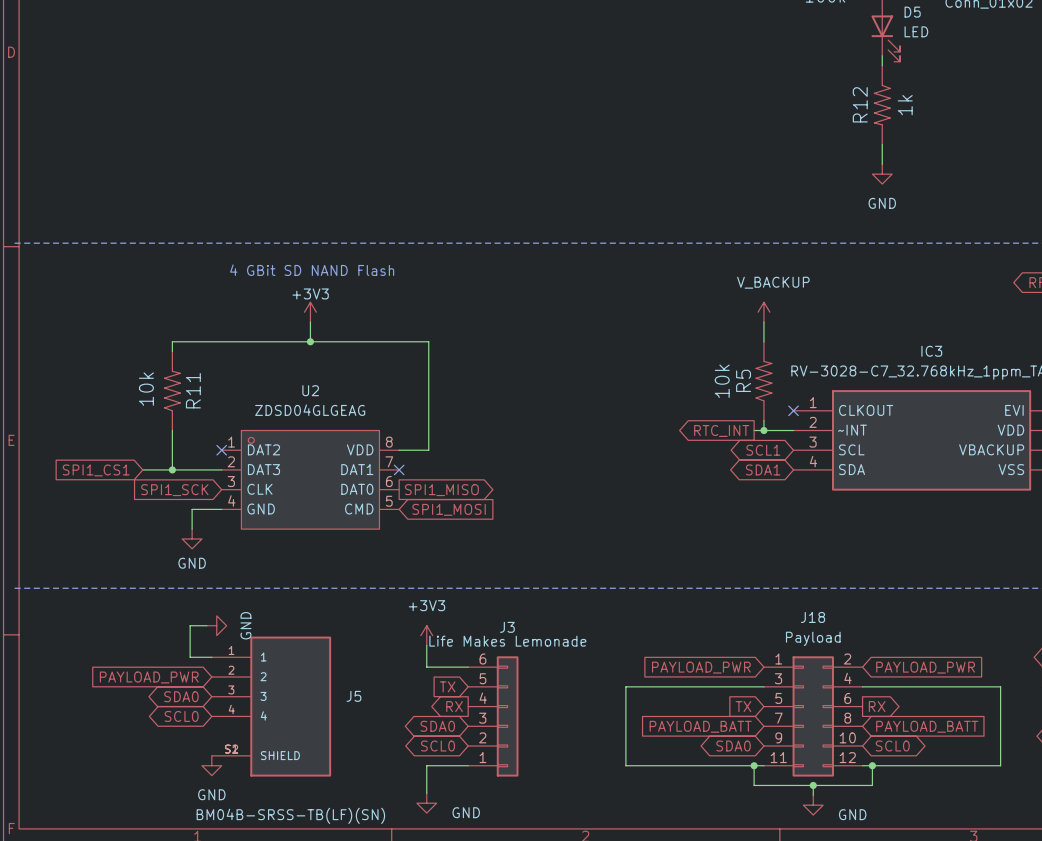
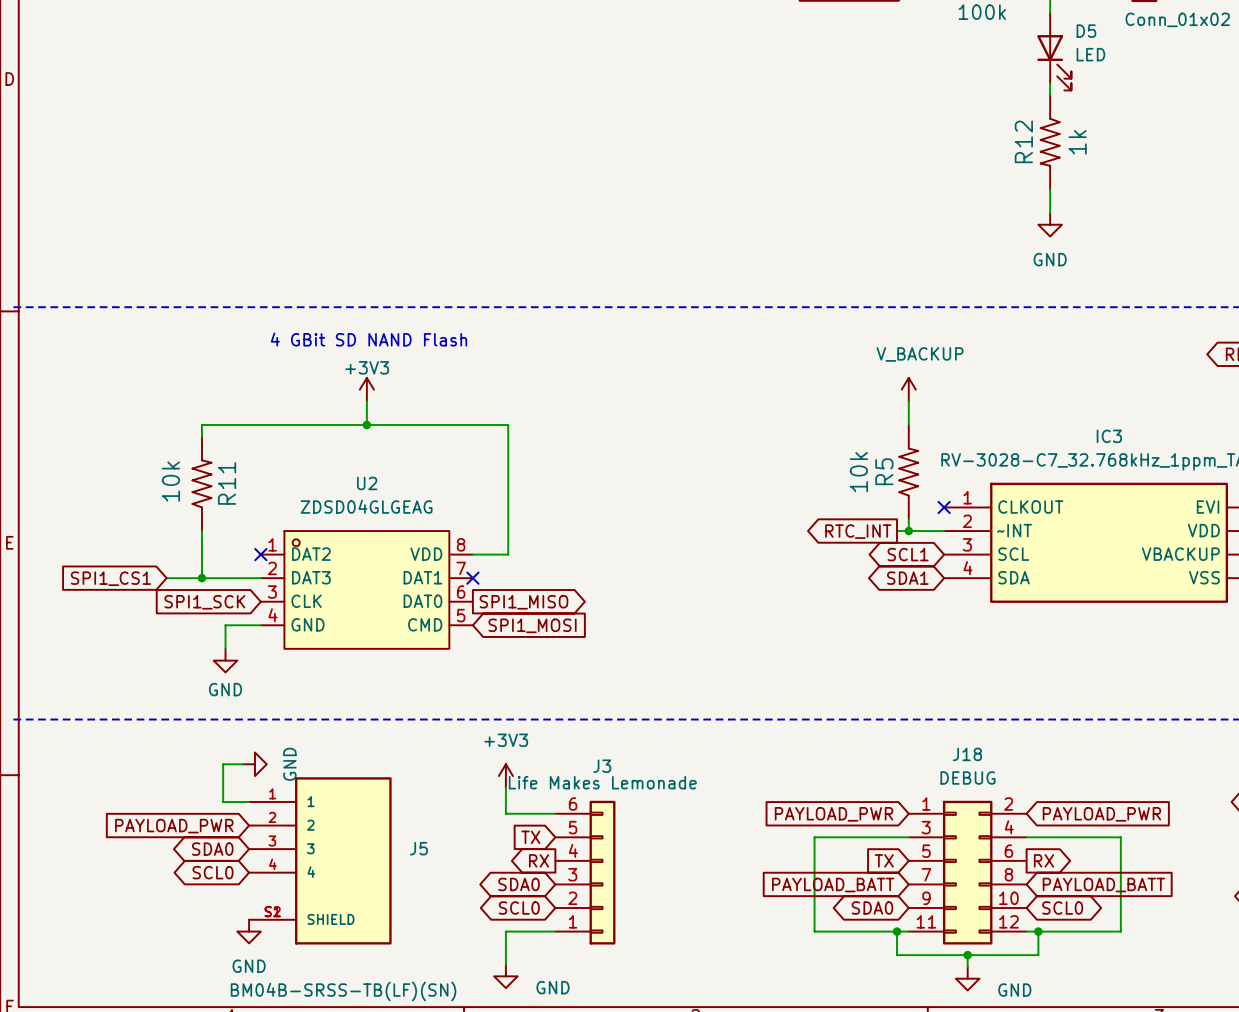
J18 value: Payload (813, 638) -> DEBUG (967, 777)
wire: (685, 686) (625, 686) (625, 765) (685, 765) -> (814, 837) (814, 931)
wire: (941, 686) (1000, 686) (1000, 765) (941, 765) -> (1120, 837) (1120, 931)

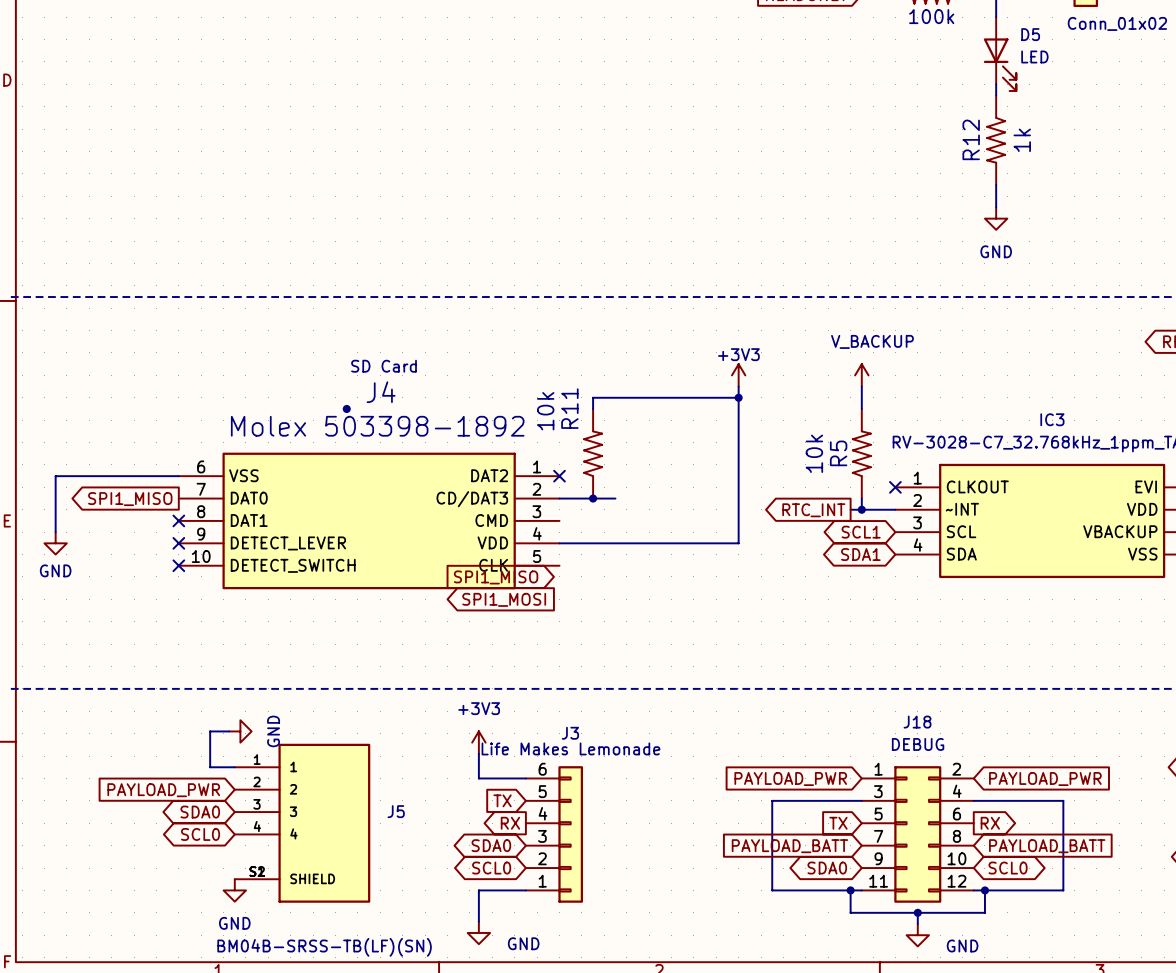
text: 4 GBit SD NAND Flash (368, 339) -> none
text: none -> SD Card (384, 366)
power symbol: +3V3 (366, 389) -> none
power symbol: none -> +3V3 (738, 375)
wire: (366, 401) (366, 425) -> none
wire: none -> (738, 386) (738, 543) (559, 543)
wire: none -> (738, 397) (593, 397) (593, 408)
junction: none -> (738, 397)
wire: (201, 436) (201, 425) (508, 425) (508, 554) (472, 554) -> none
R11 value position: 10k (170, 481) -> 10k (545, 411)
R11 position: (201, 483) -> (593, 453)
R11 name position: R11 (227, 483) -> R11 (569, 408)
wire: none -> (178, 476) (55, 476) (55, 532)
no-connect mark: none -> (559, 476)
global label: none -> SPI1_MISO (130, 499)
wire: none -> (559, 498) (615, 498)
junction: none -> (593, 498)
wire: (201, 531) (201, 578) -> none
no-connect mark: none -> (178, 520)
J4: none -> Molex 503398-1892 (369, 520)
no-connect mark: (260, 554) -> none
no-connect mark: none -> (178, 543)
global label: SPI1_CS1 (110, 578) -> none
wire: (166, 578) (260, 578) -> none
junction: (201, 578) -> none
no-connect mark: (472, 578) -> none
no-connect mark: none -> (178, 565)
U2: ZDSD04GLGEAG (366, 589) -> none
global label: SPI1_SCK (204, 602) -> none
wire: (260, 625) (225, 625) (225, 648) -> none
power symbol position: GND (225, 660) -> GND (55, 543)

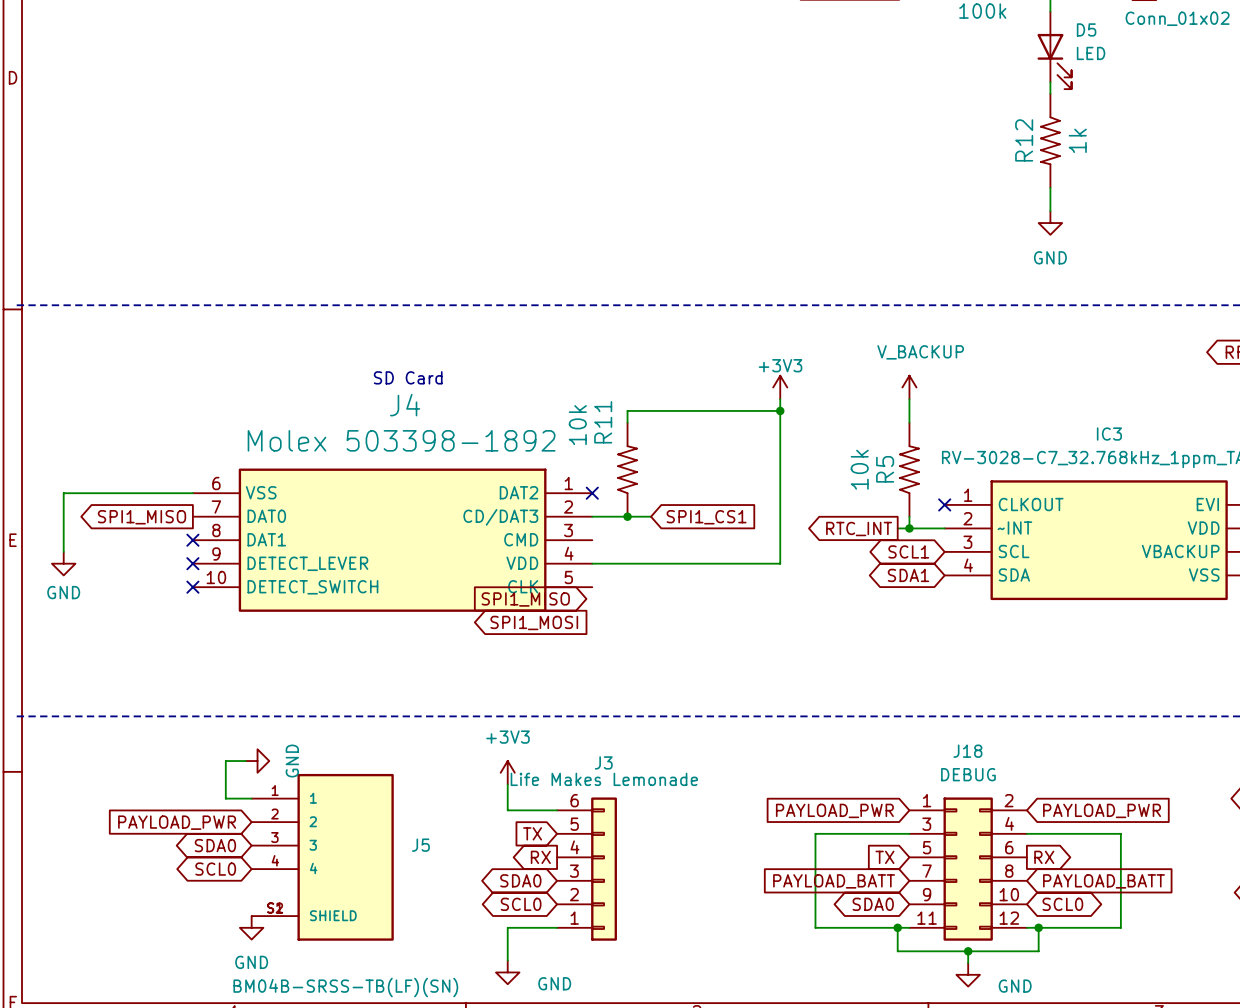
junction: (346, 408) -> none
global label: none -> SPI1_CS1 (706, 517)

